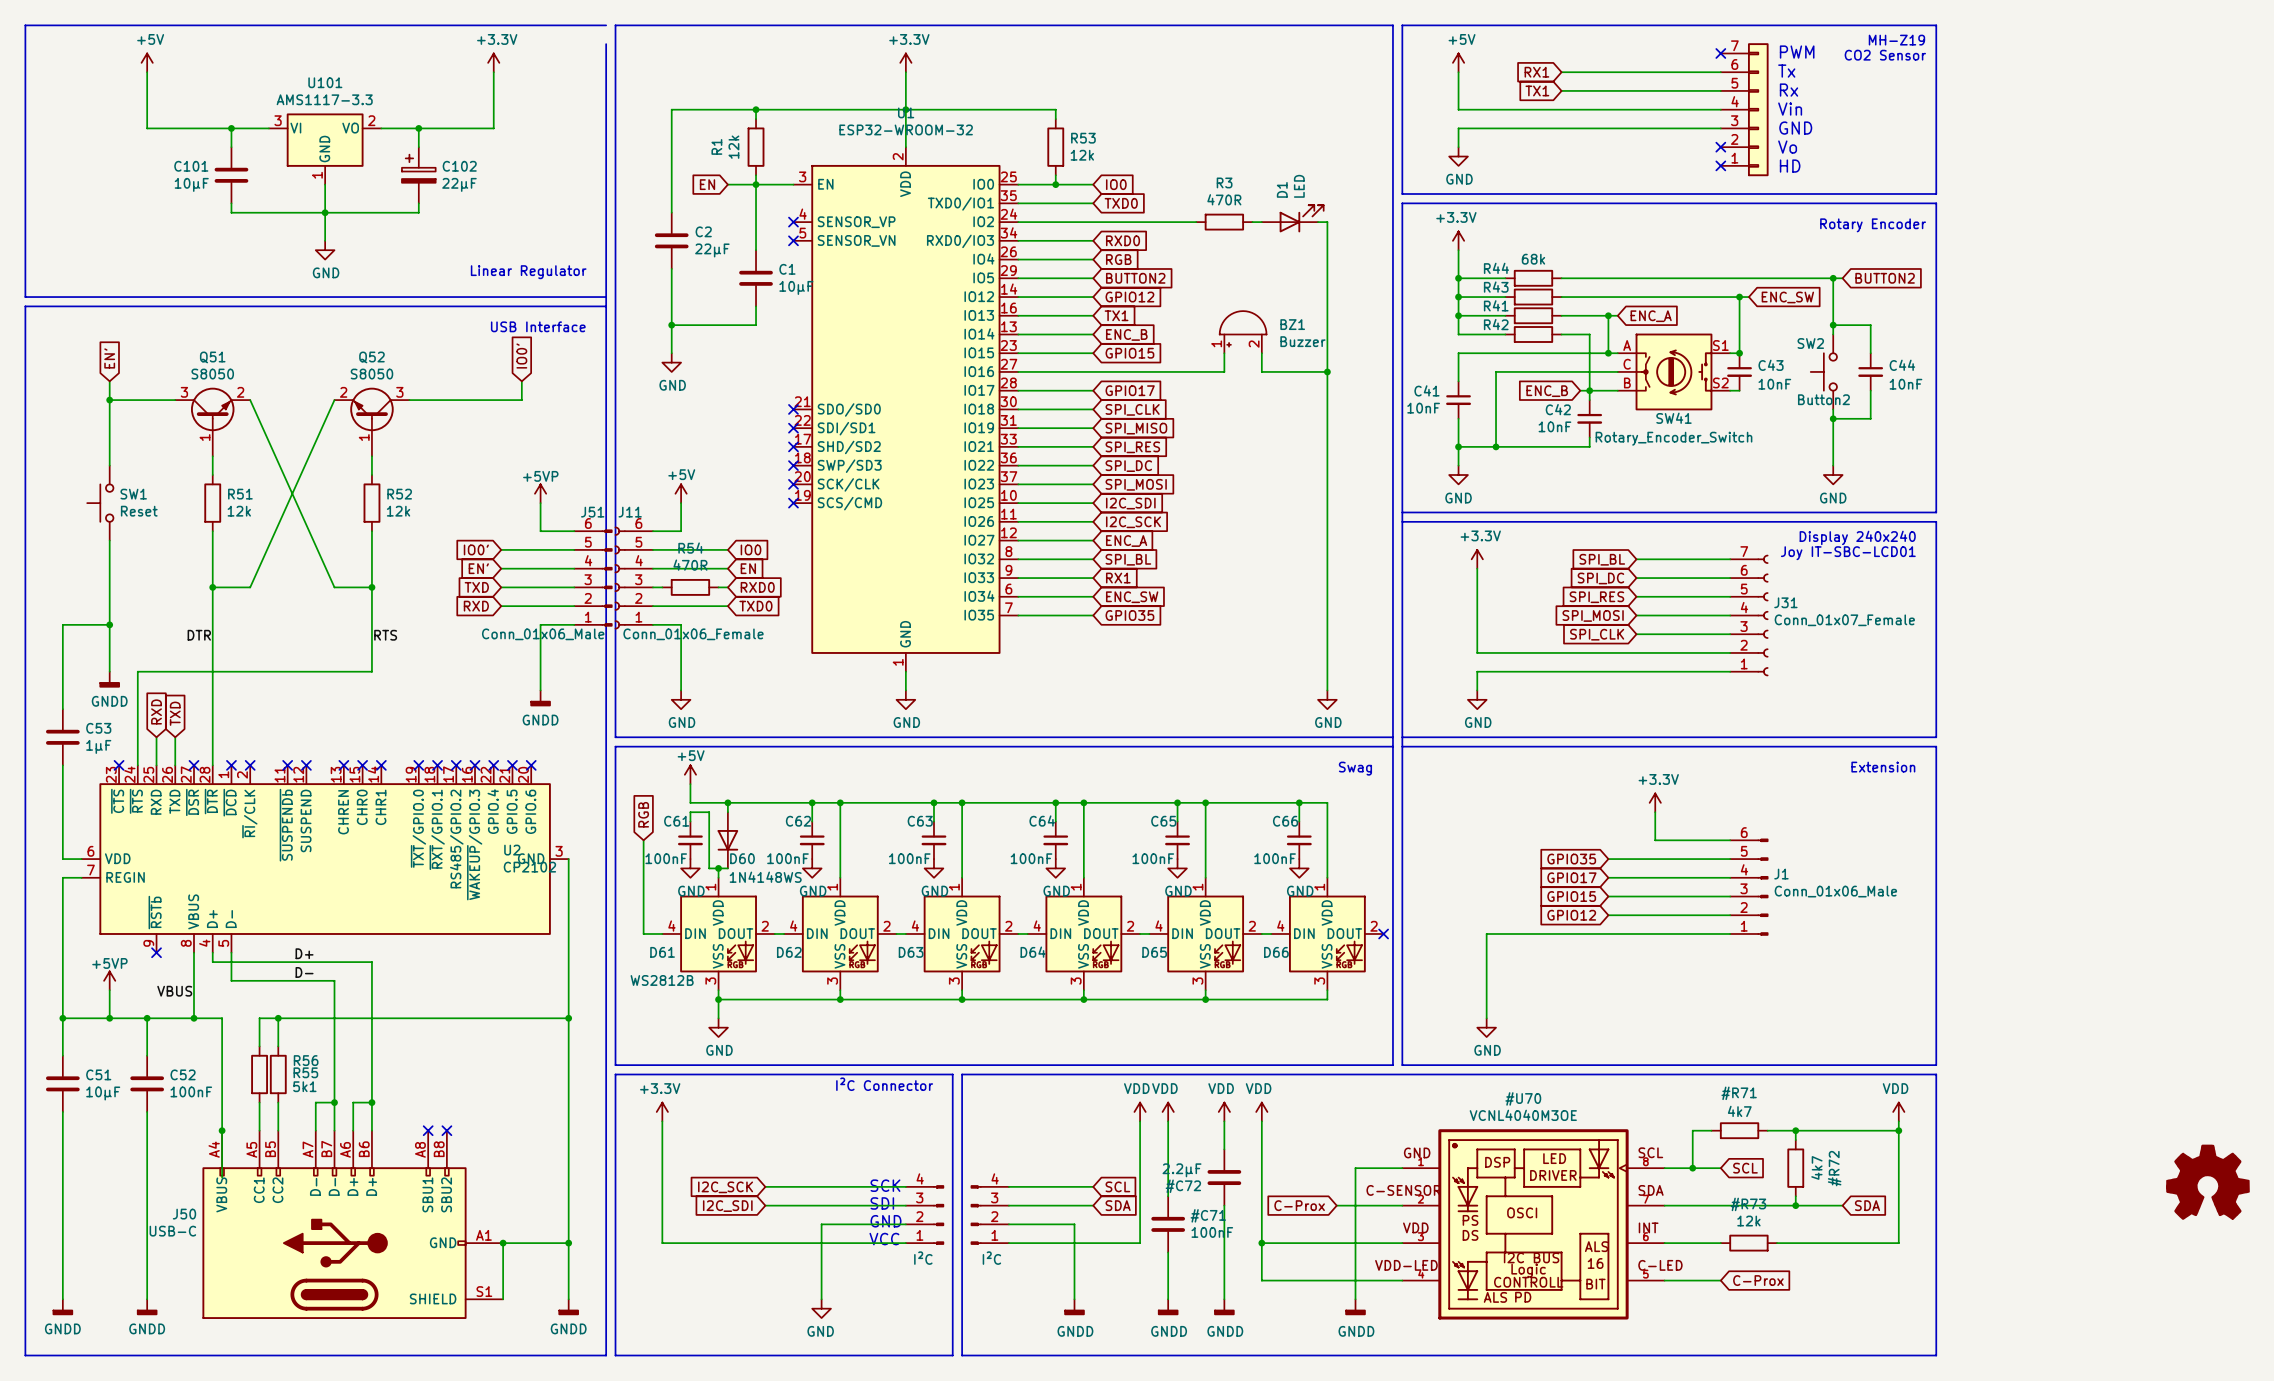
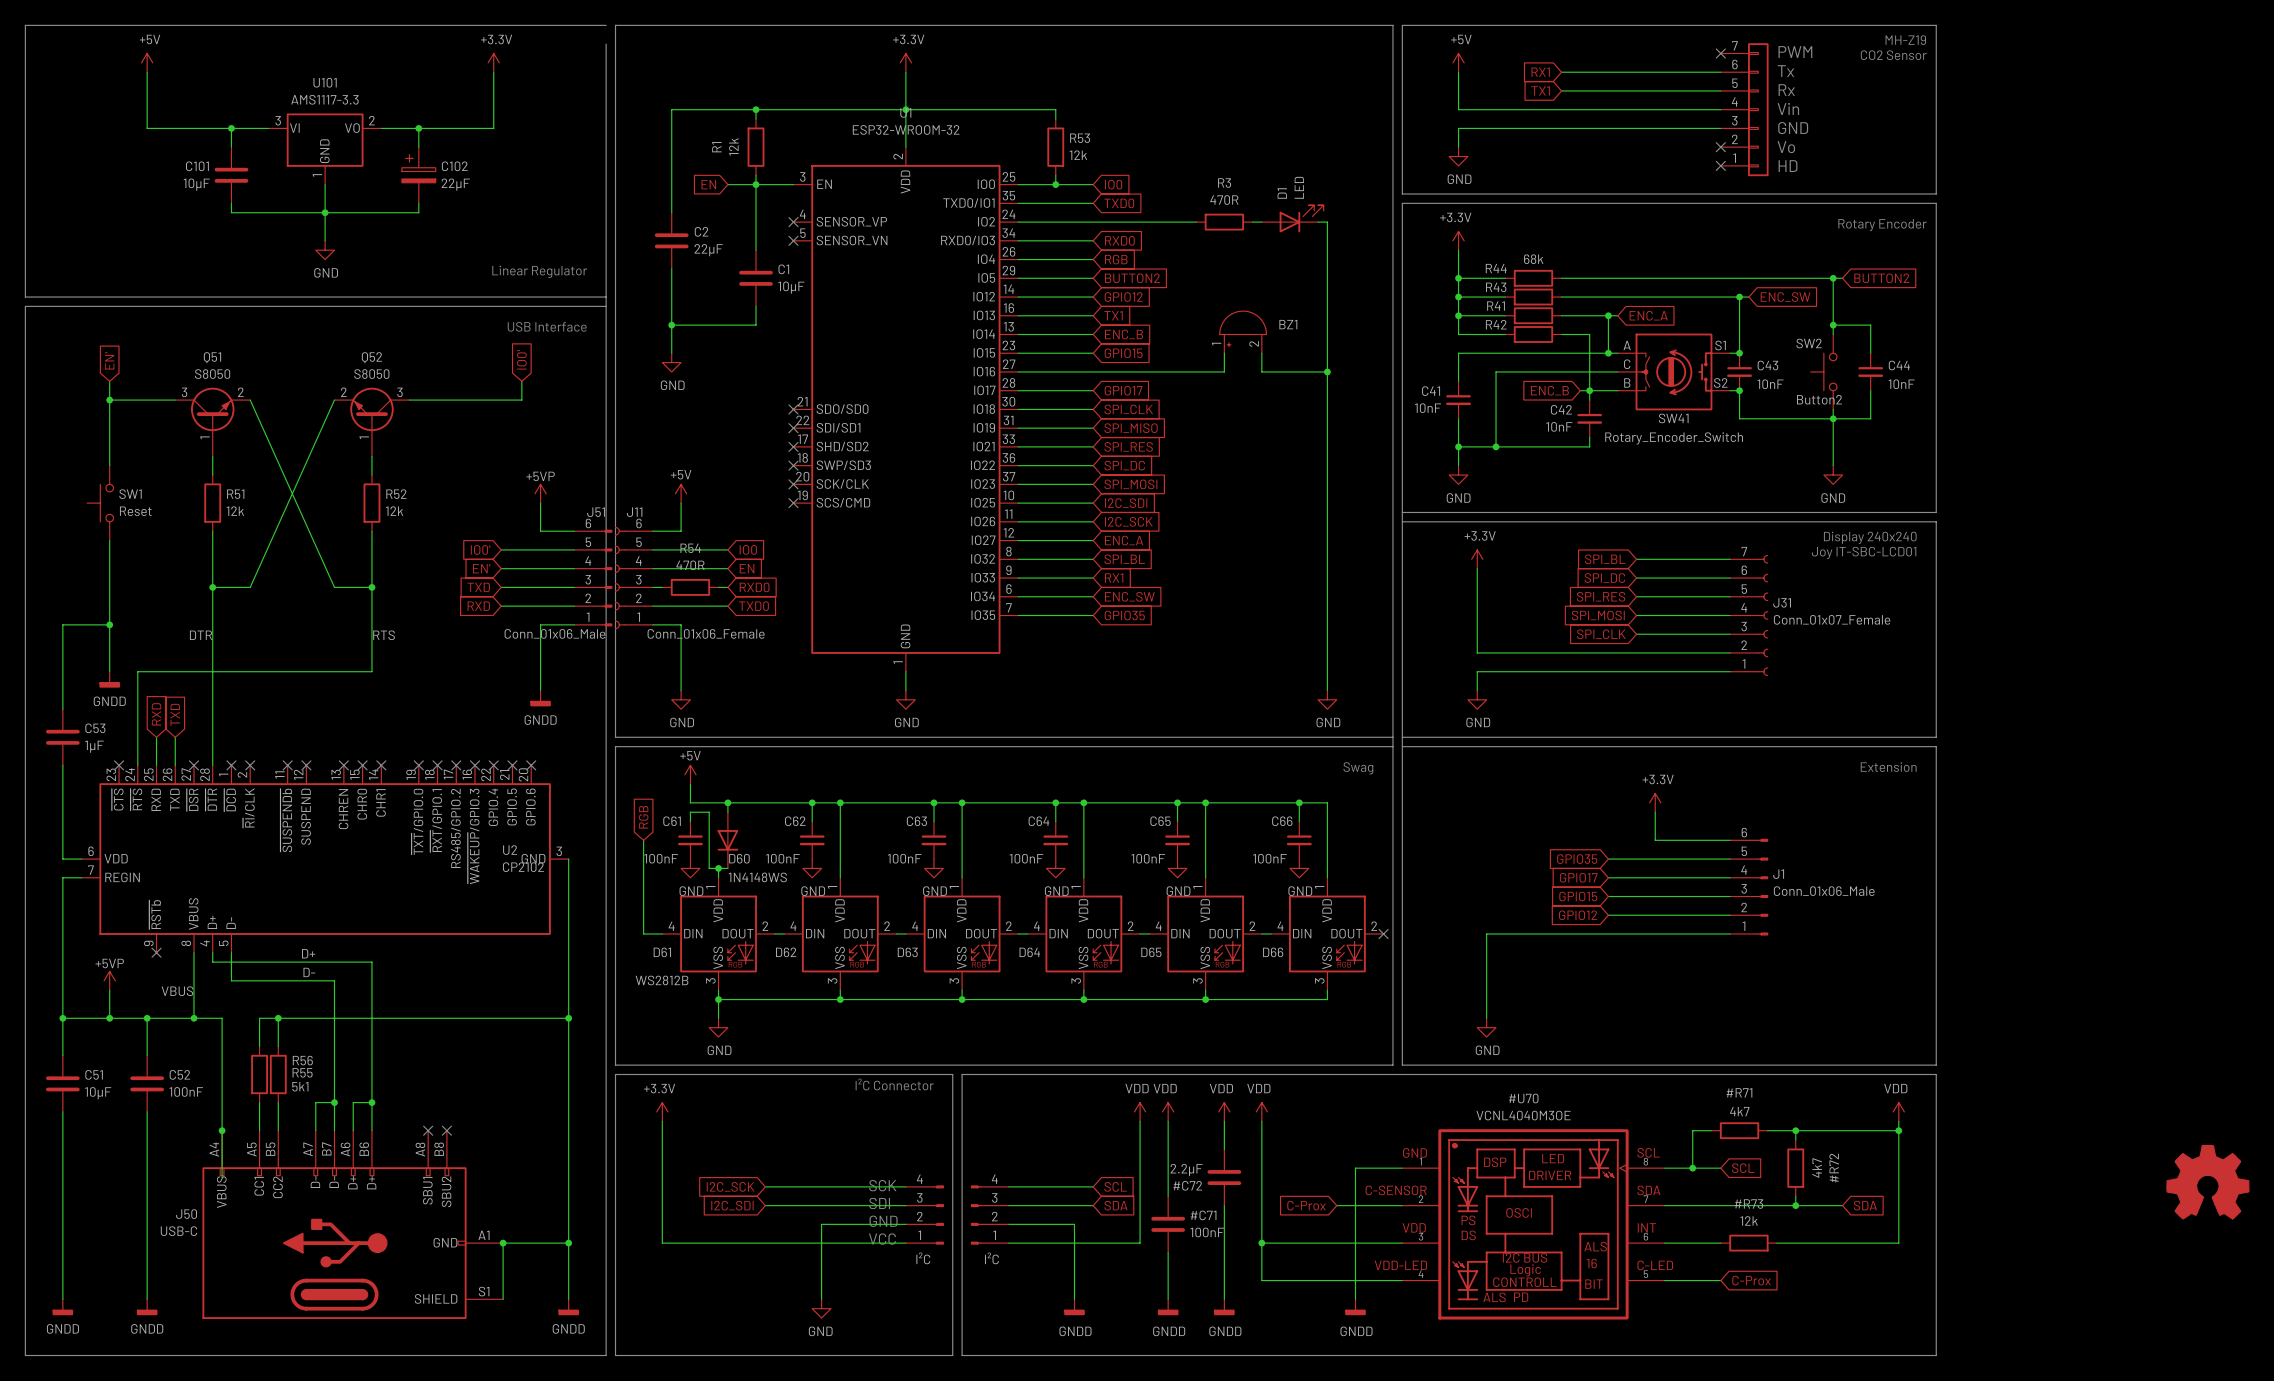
BZ1 value: Buzzer (1302, 341) -> none
wire: none -> (1739, 390) (1739, 418) (1833, 418)
junction: none -> (1739, 390)

